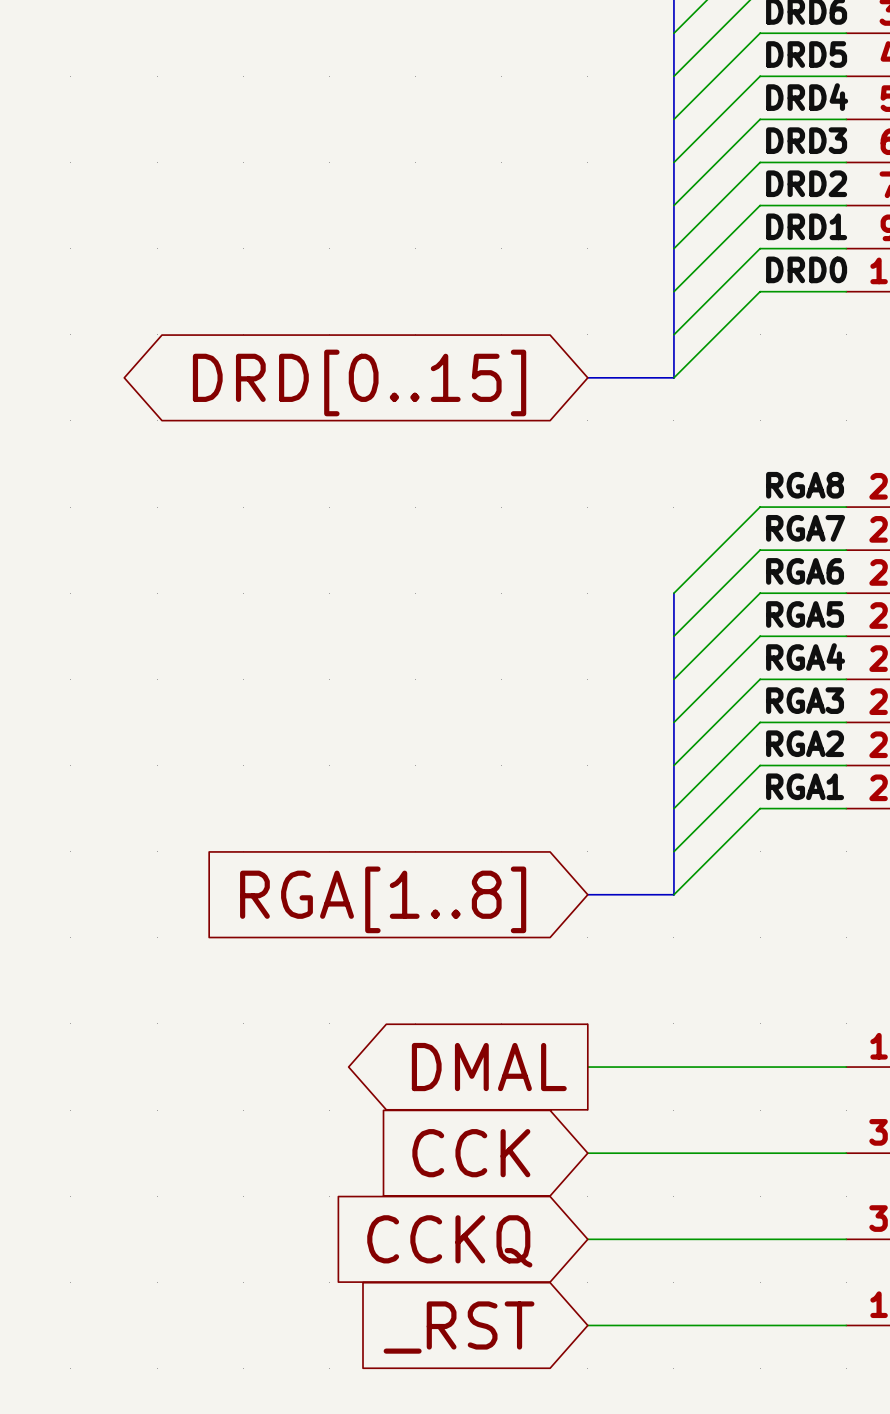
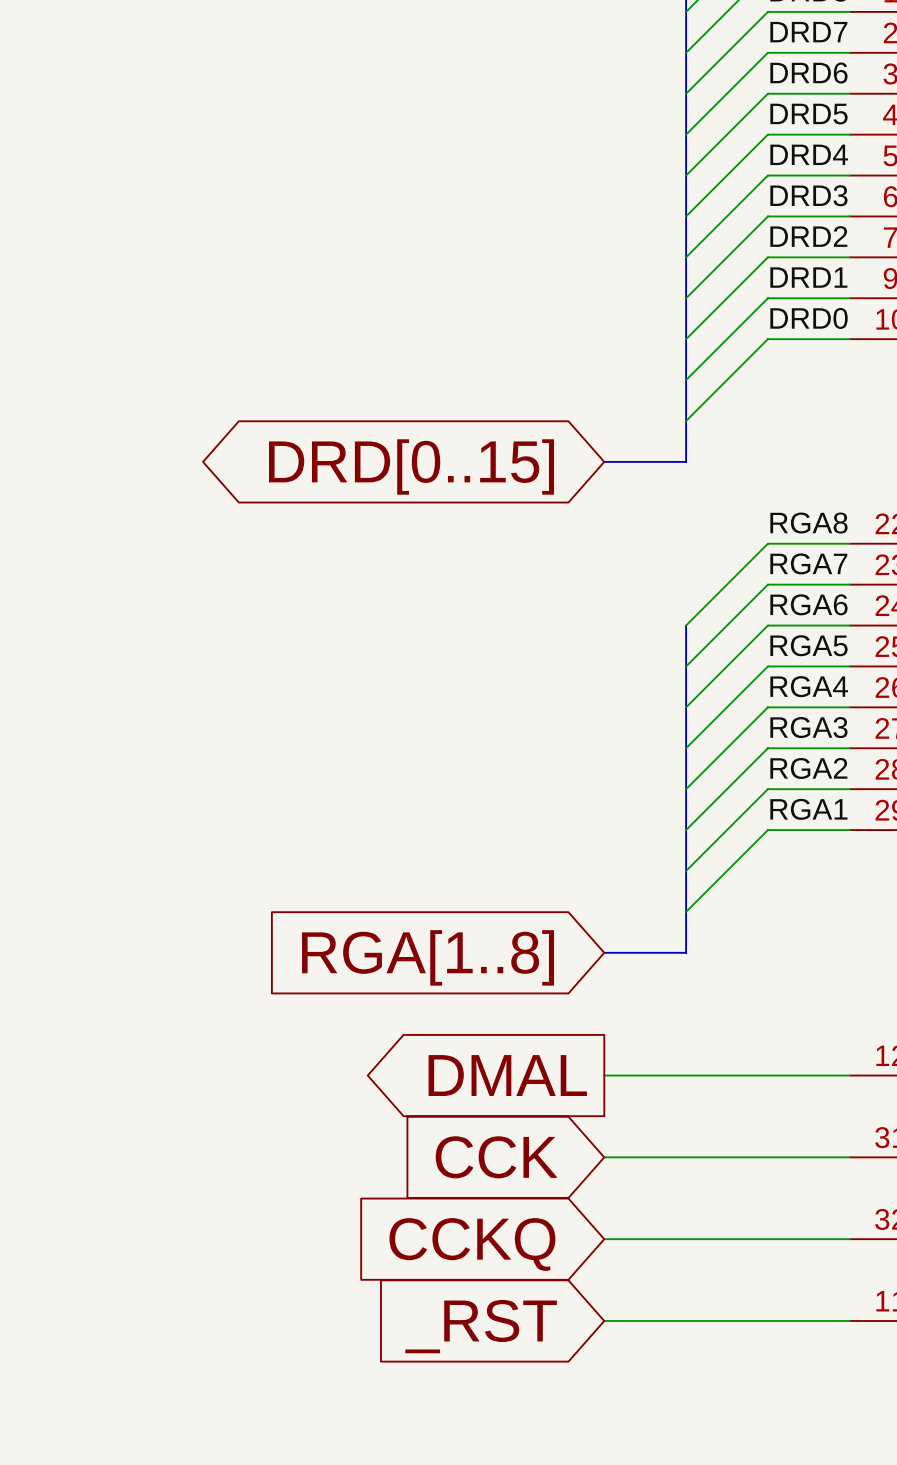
bus: (587, 377) (673, 377) -> (604, 461) (686, 461) (686, 421)
global label position: DRD[0..15] (359, 382) -> DRD[0..15] (411, 466)
bus: (587, 894) (673, 894) -> (604, 952) (686, 952) (686, 911)
global label position: RGA[1..8] (383, 899) -> RGA[1..8] (428, 957)

